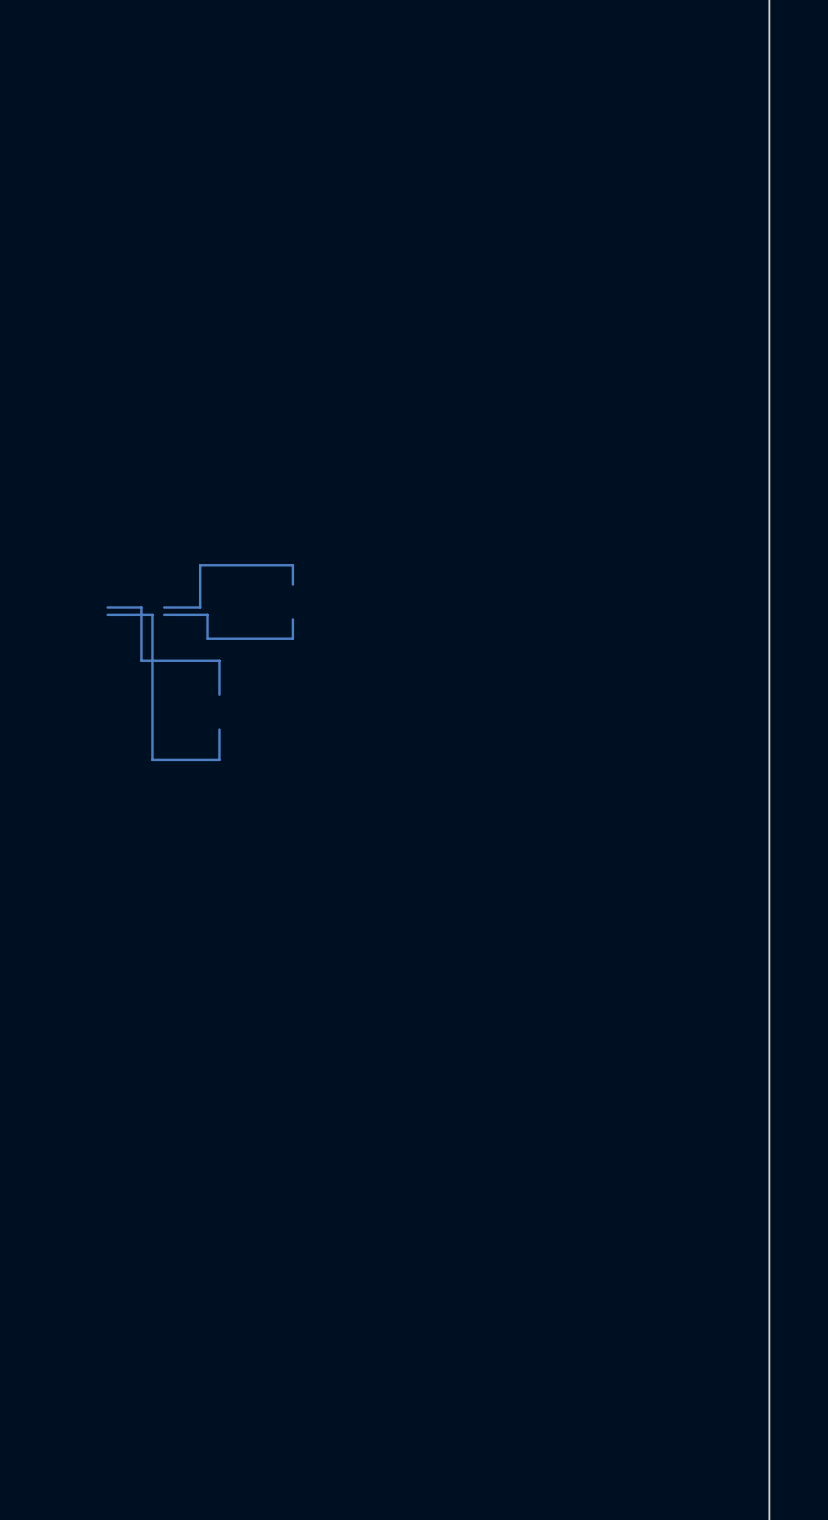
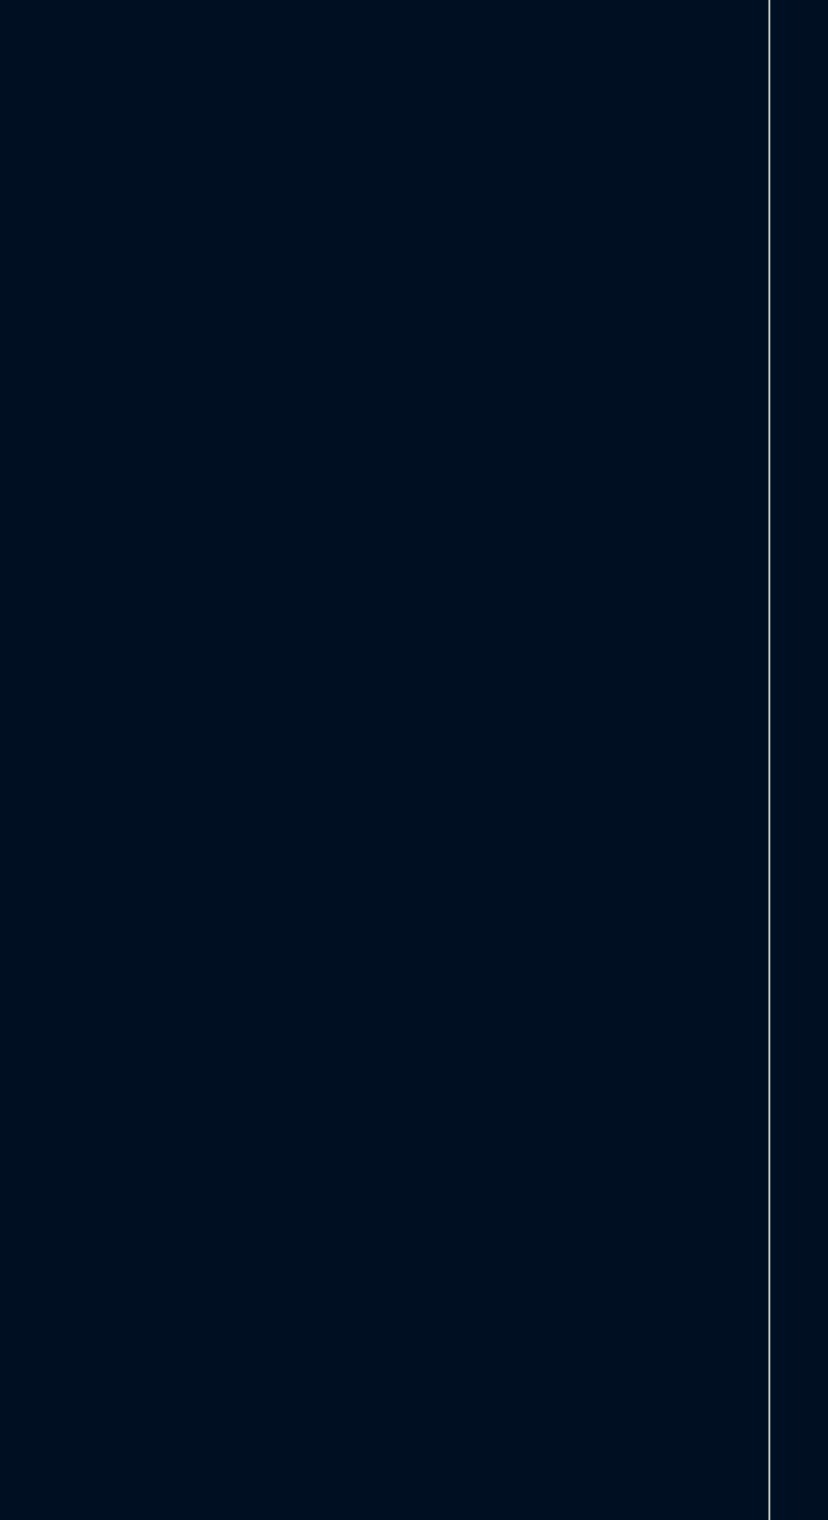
track: (292, 584) (292, 565) (200, 565) (200, 607) (164, 607) -> none
track: (107, 607) (141, 607) (141, 660) (219, 660) (219, 694) -> none
track: (107, 614) (152, 614) (152, 759) (219, 759) (219, 729) -> none
track: (164, 614) (207, 614) (207, 638) (292, 638) (292, 619) -> none

